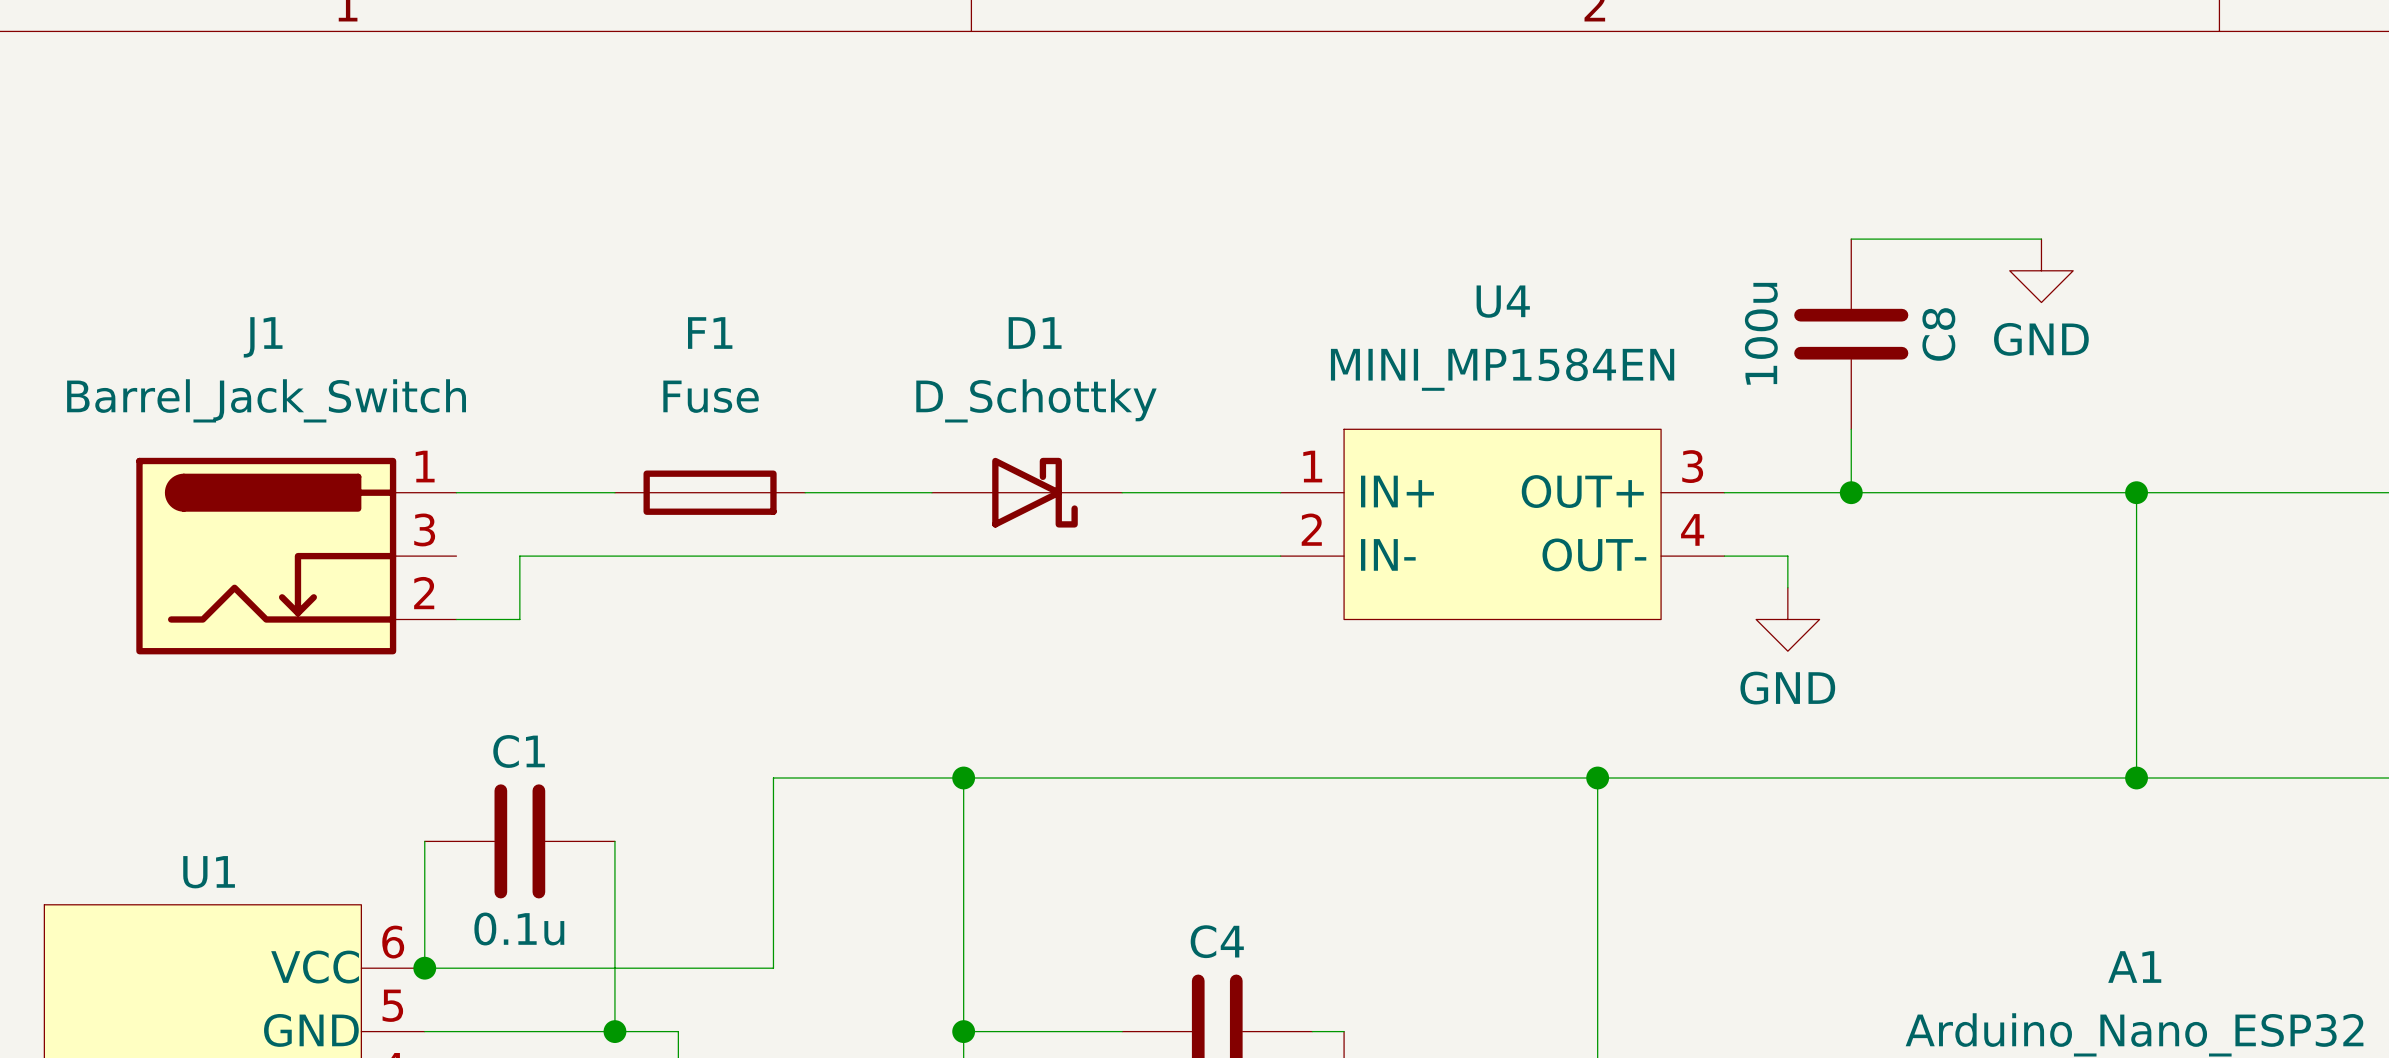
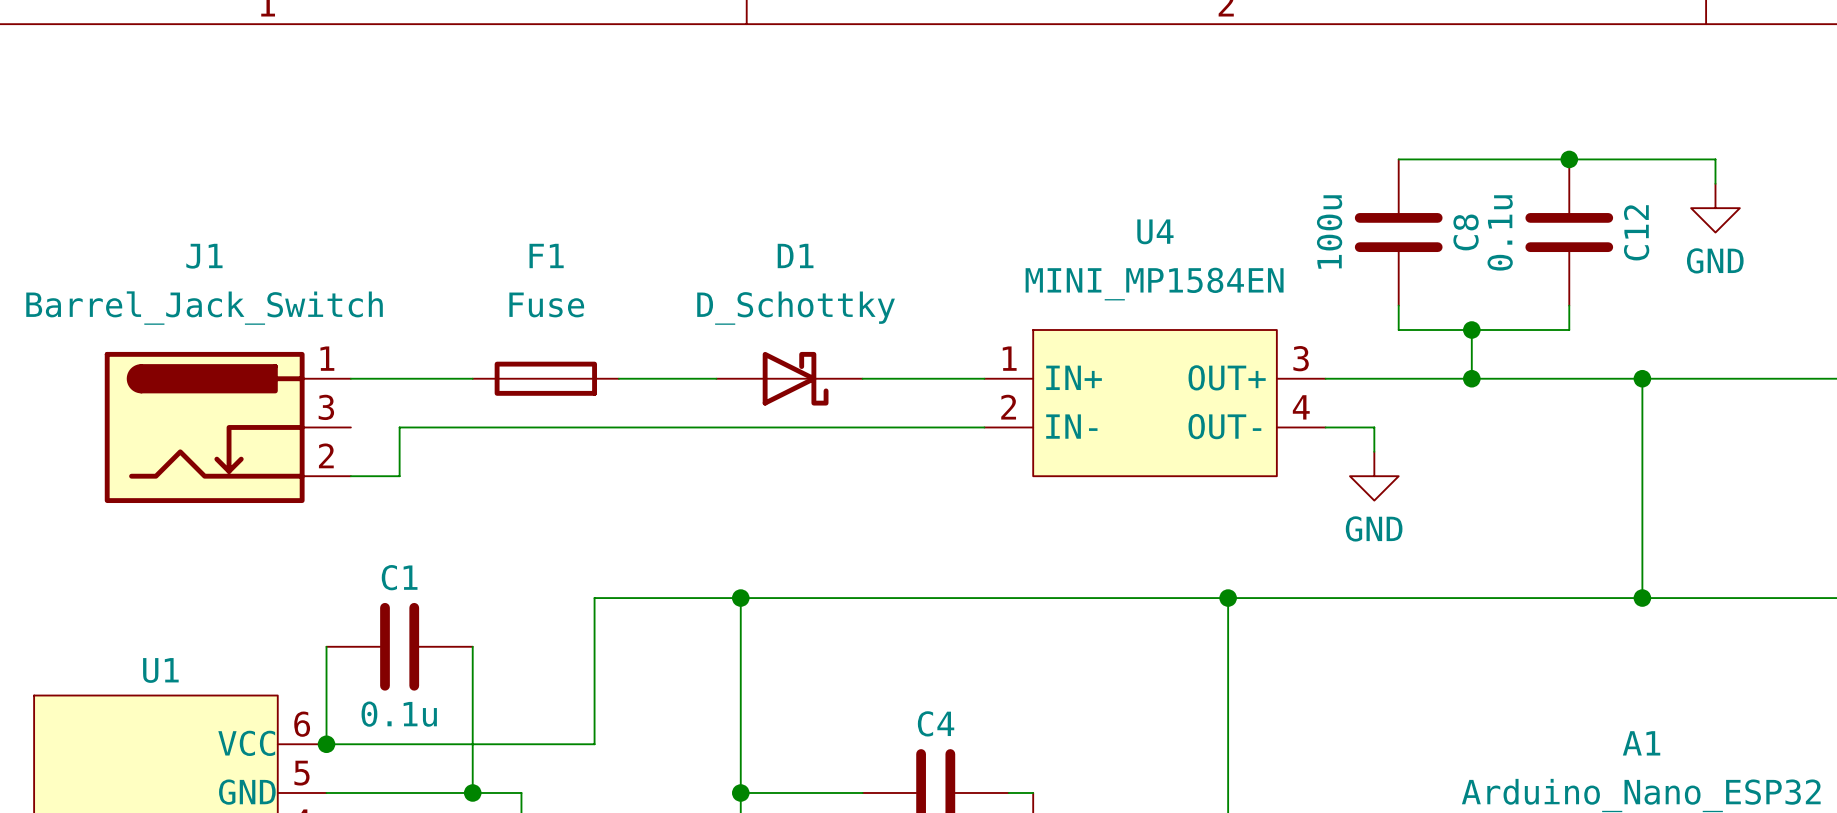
wire: none -> (1398, 159) (1715, 159) (1715, 183)
junction: none -> (1569, 159)
wire: (1851, 239) (2041, 239) -> none
power symbol position: GND (2041, 270) -> GND (1715, 208)
C12: none -> 0.1u (1569, 232)
C8 position: (1851, 334) -> (1398, 232)
wire: none -> (1398, 305) (1398, 330) (1569, 330) (1569, 305)
wire: (1851, 429) (1851, 492) -> (1471, 330) (1471, 378)
junction: none -> (1471, 330)
junction: (1851, 492) -> none
junction: none -> (1471, 378)

